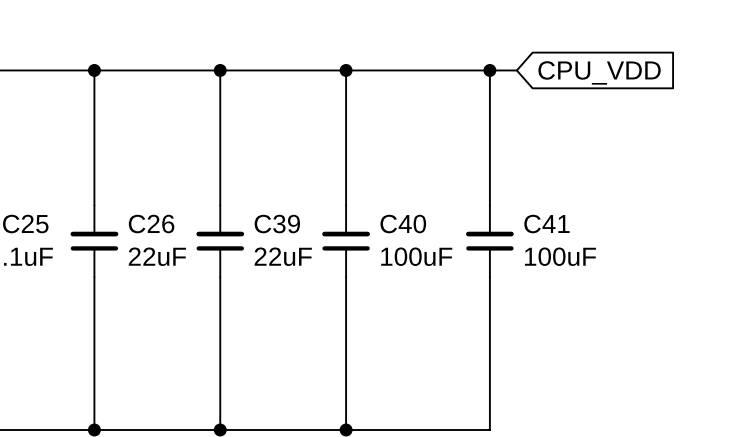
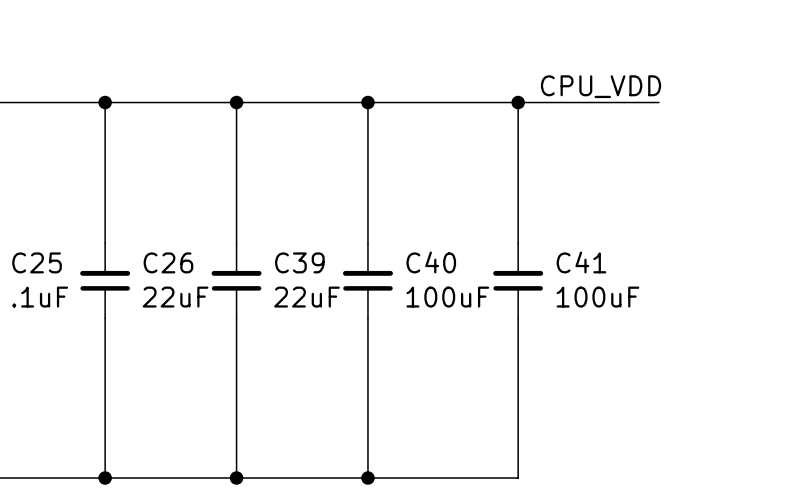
label: none -> CPU_VDD (601, 86)
wire: none -> (546, 102) (658, 102)
global label: CPU_VDD (599, 72) -> none

